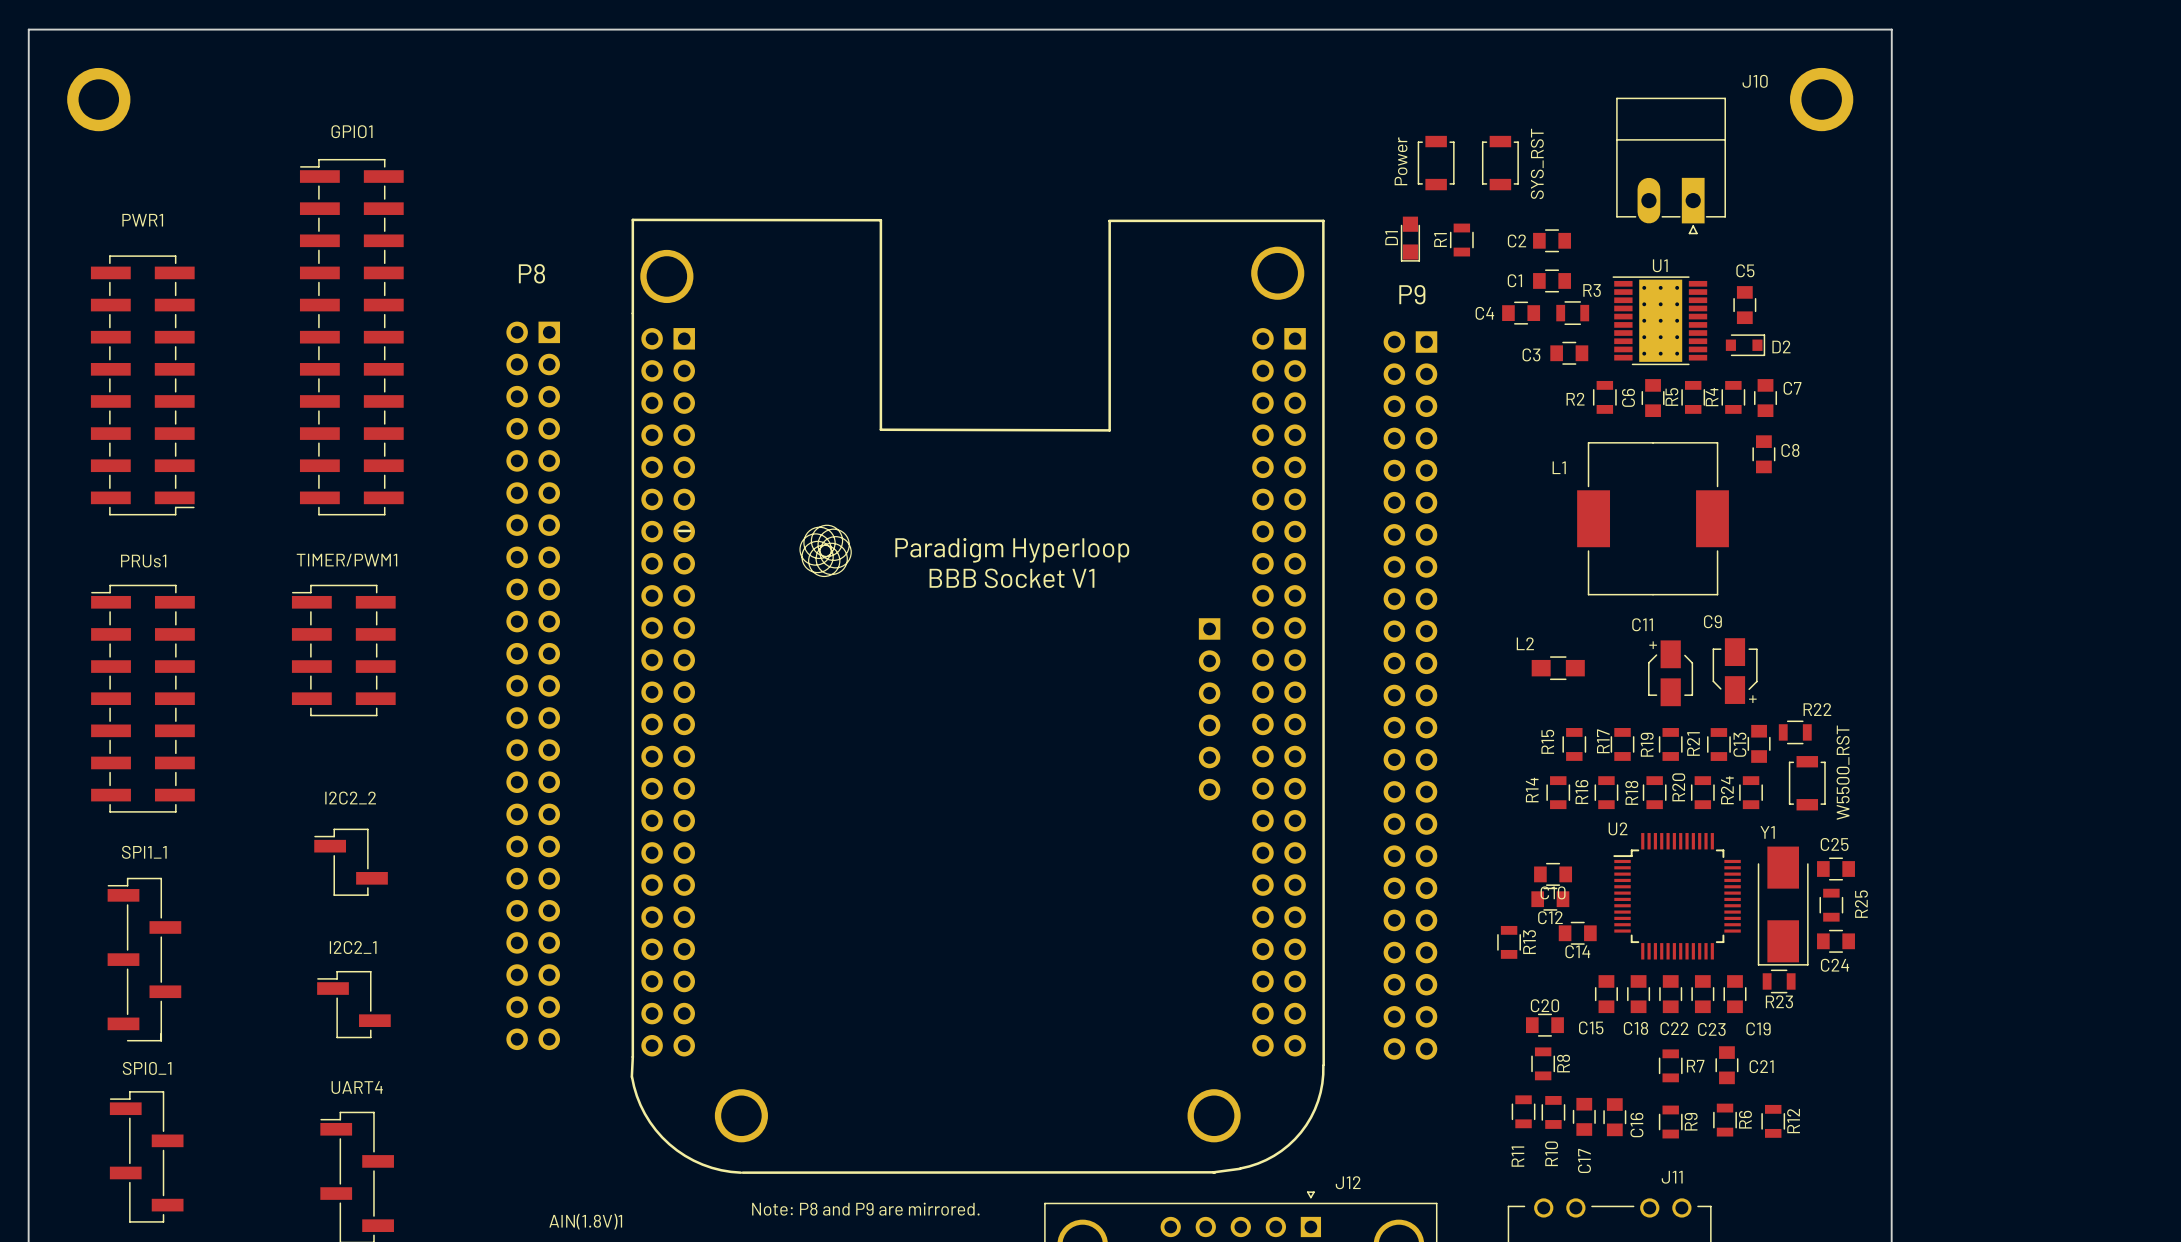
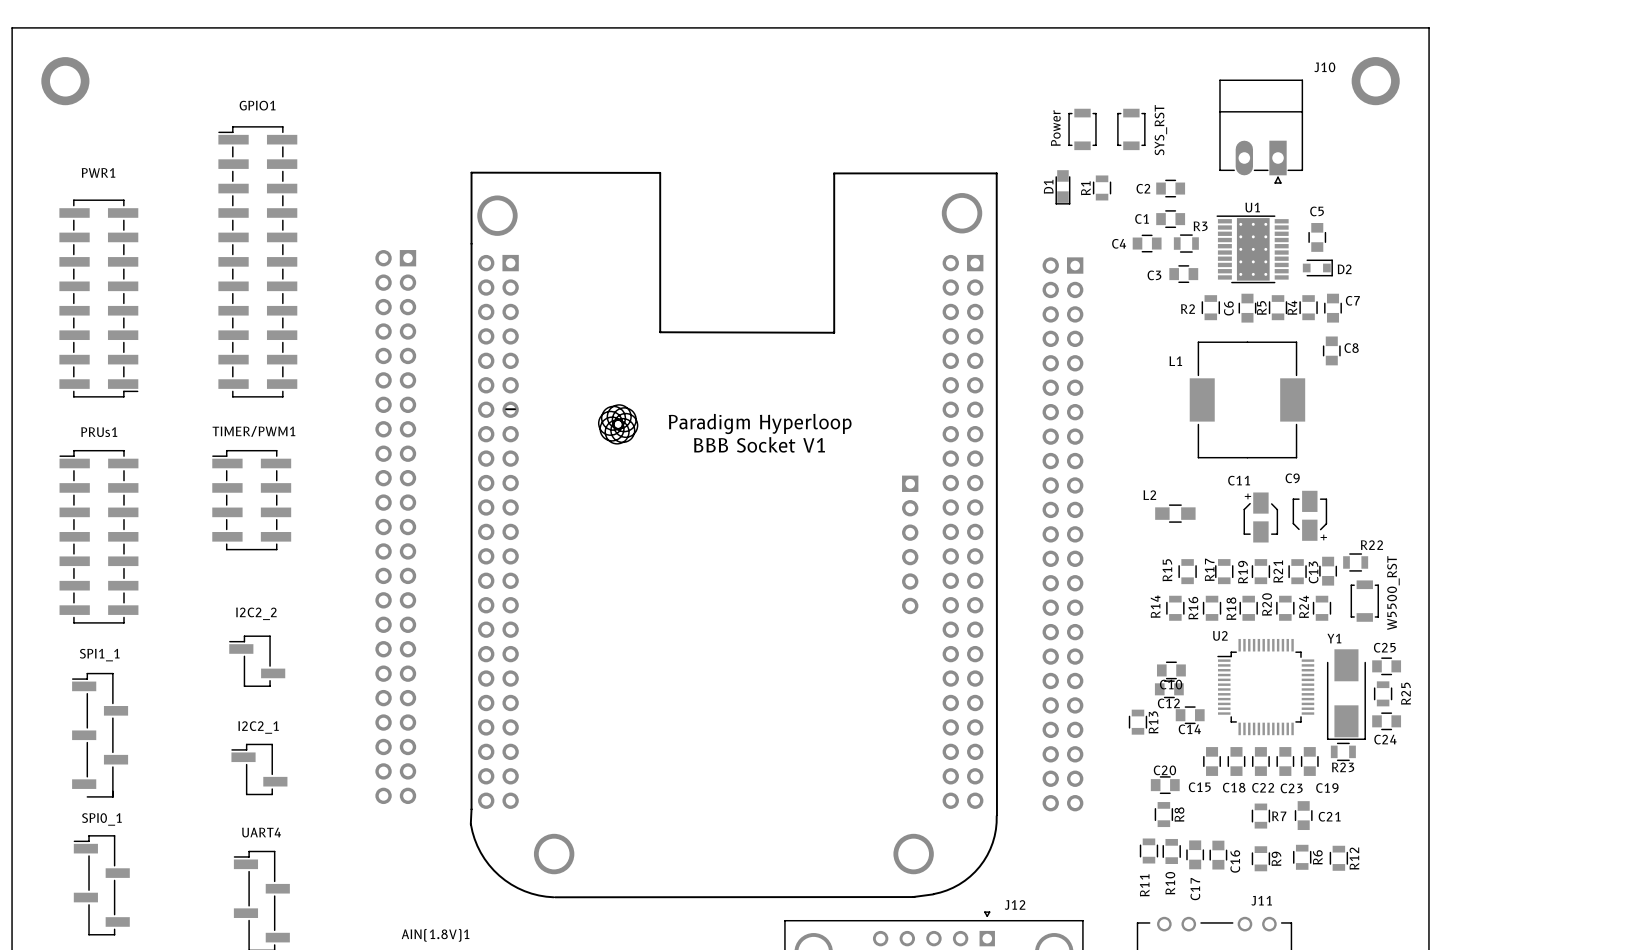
text: P8 (531, 273) -> none
text: P9 (1412, 294) -> none
text: Note: P8 and P9 are mirrored. (865, 1209) -> none

